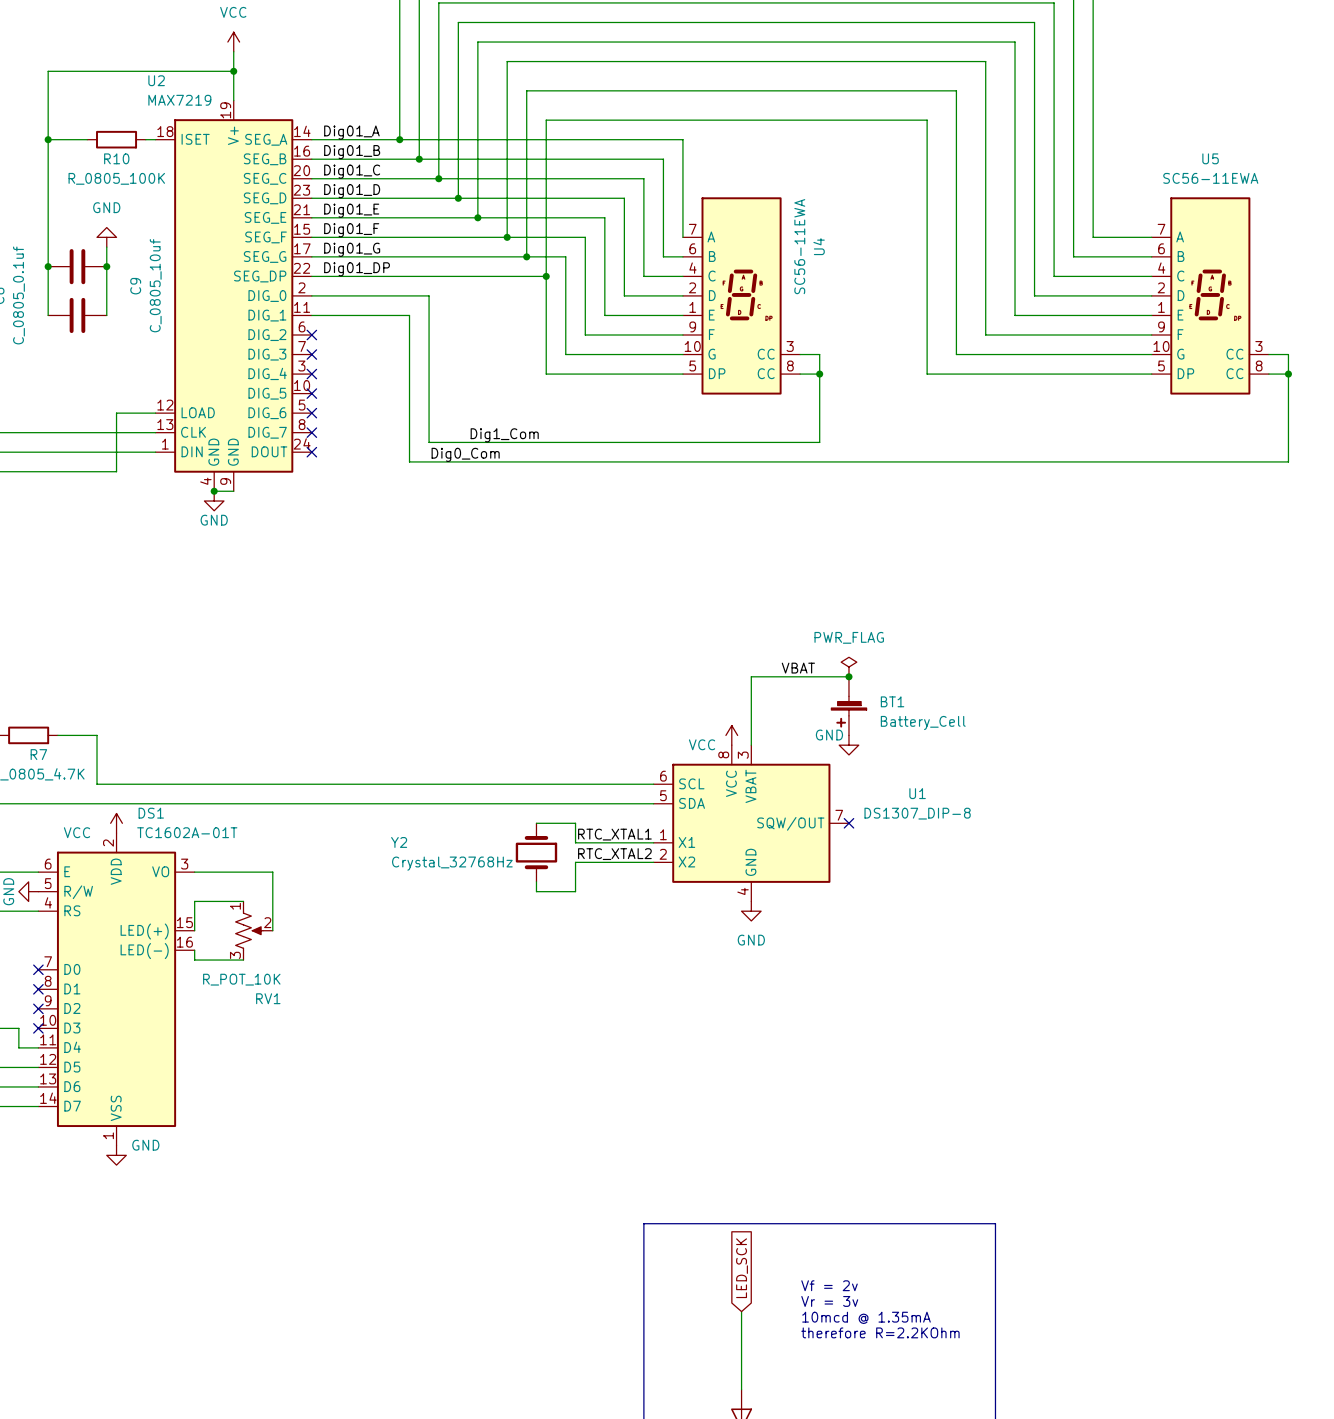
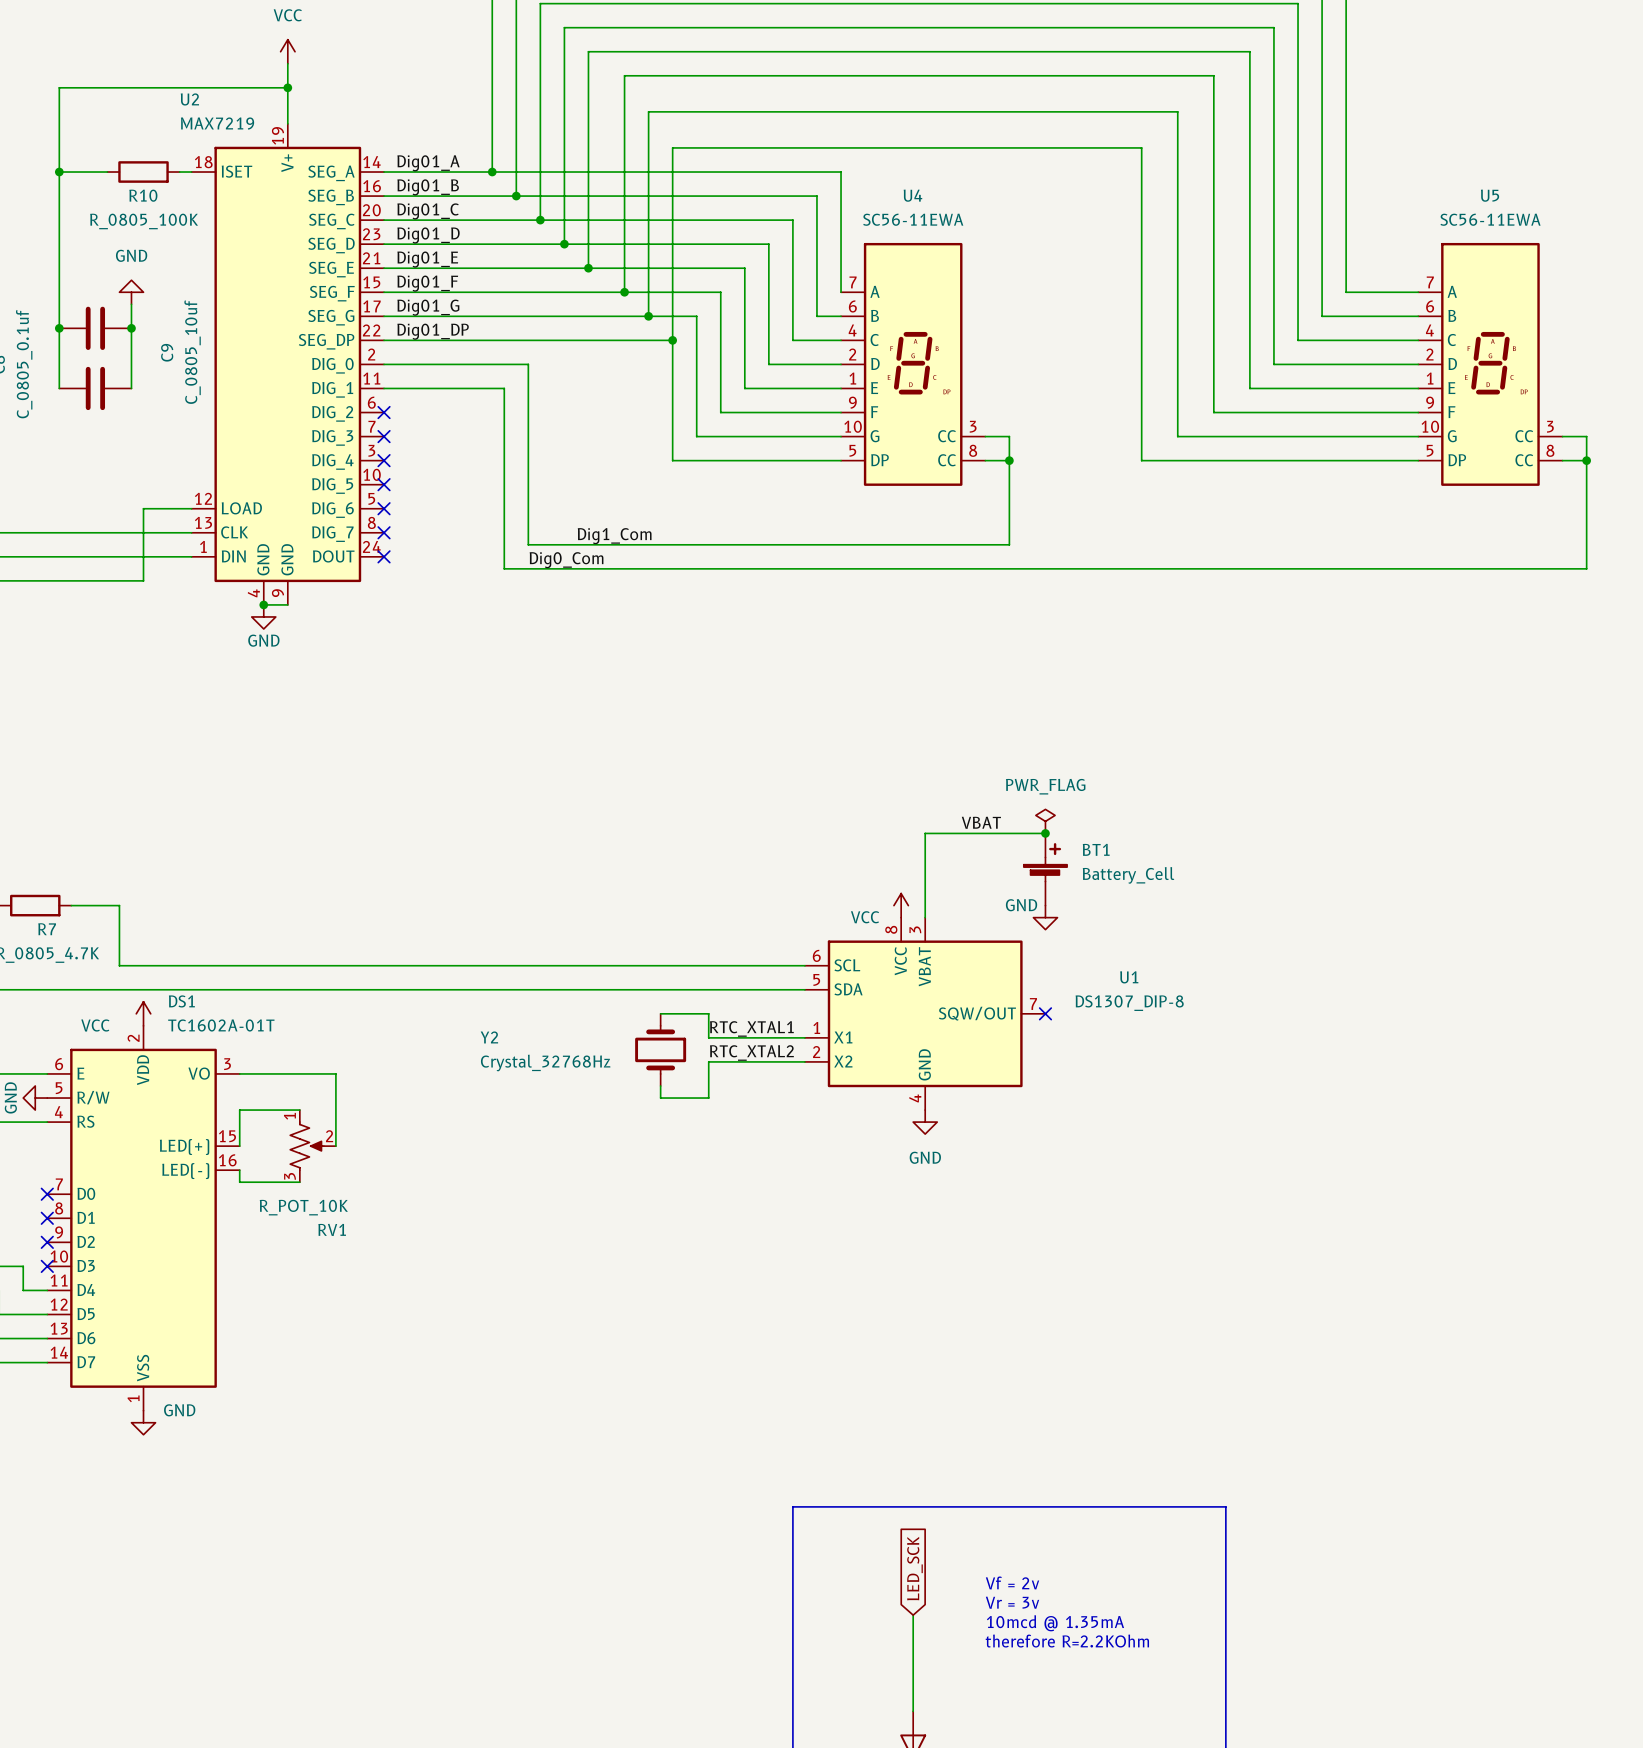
U4 value rotation: 0° (799, 246) -> 90° clockwise (913, 219)
U4 name rotation: 0° (819, 246) -> 90° clockwise (912, 195)
U4 name position: U4 (819, 246) -> U4 (912, 195)
BT1 rotation: 0° (848, 711) -> 180° (1045, 862)

